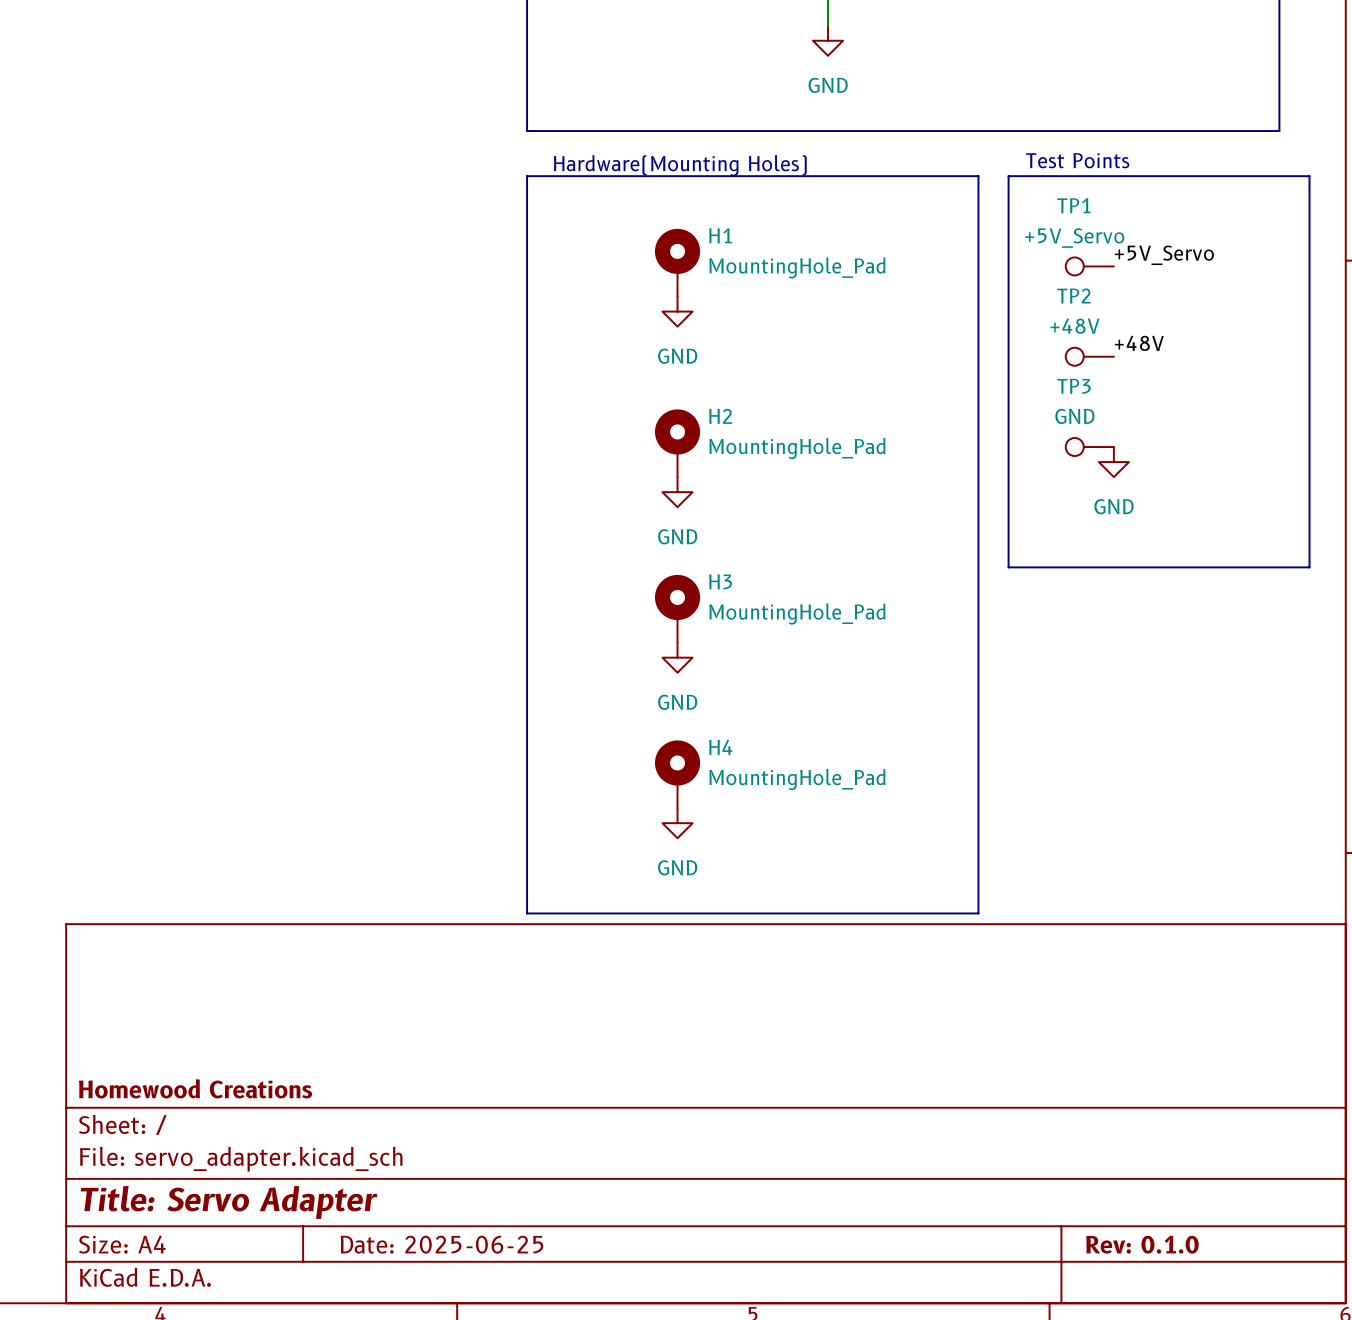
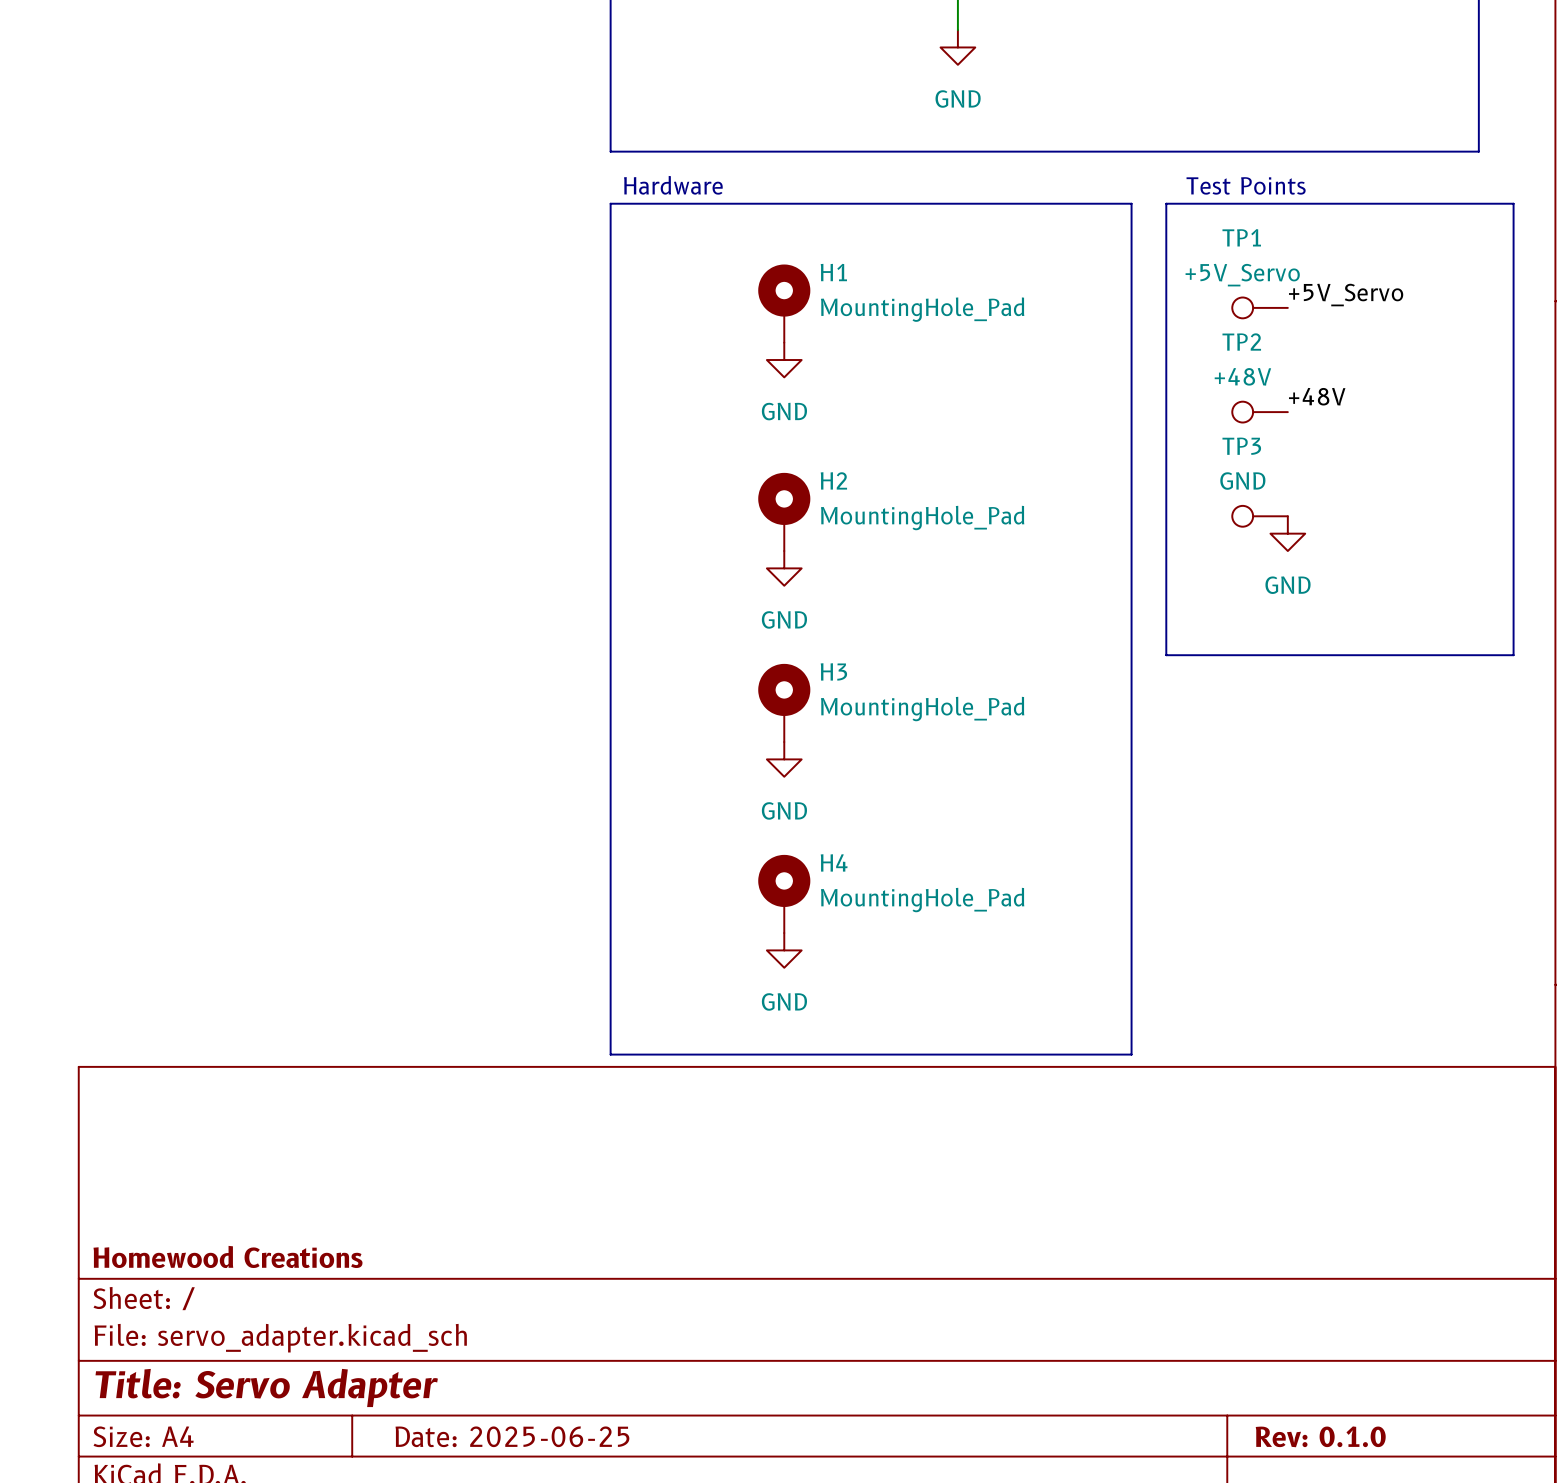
text: none -> Hardware (673, 185)
text: Hardware(Mounting Holes) (680, 165) -> none

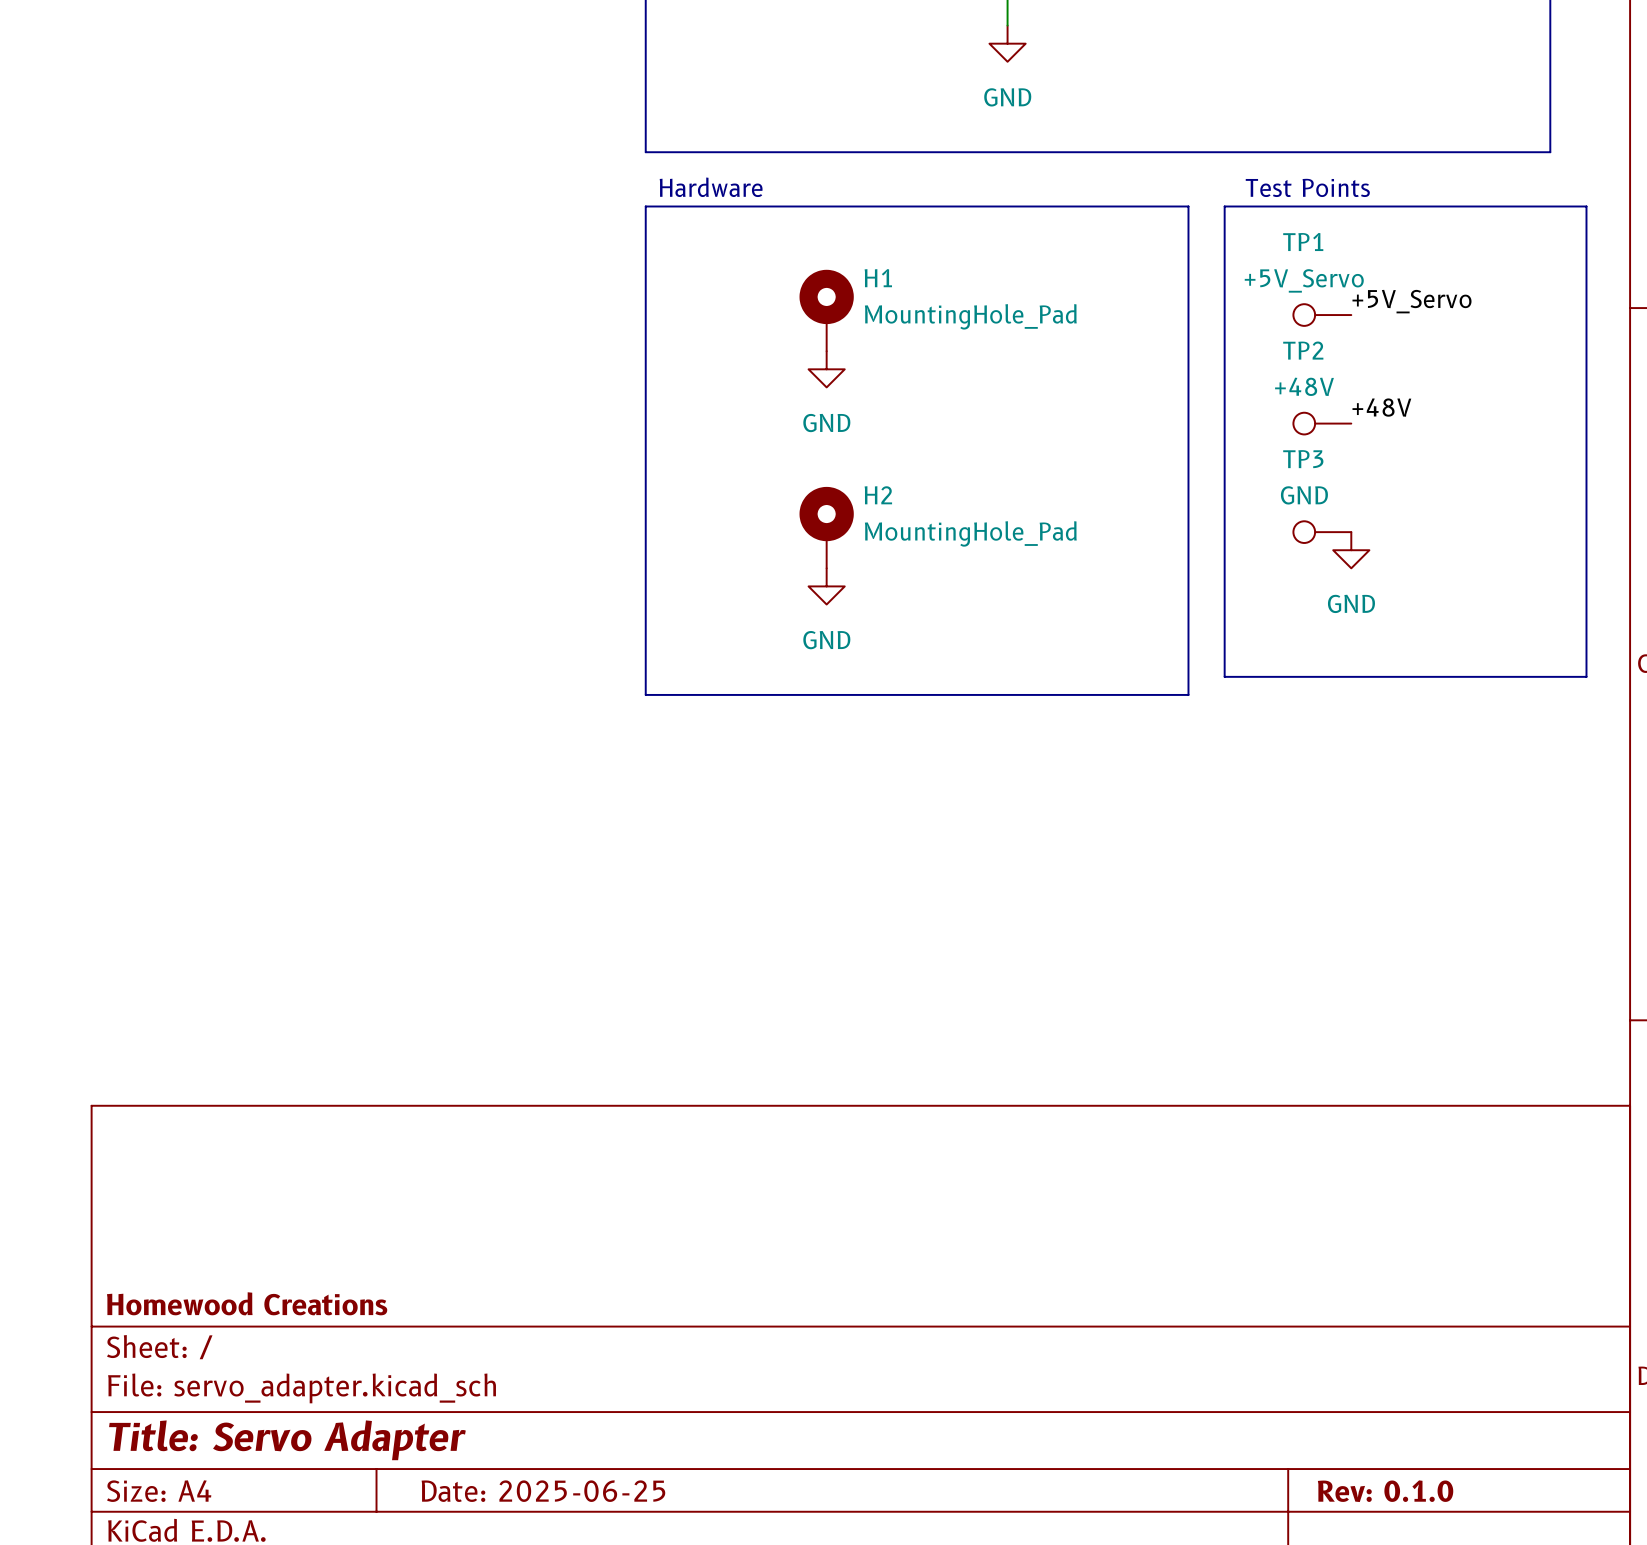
line: (610, 672) (610, 1054) (1131, 1054) (1131, 672) -> (645, 694) (1188, 694)
H3: MountingHole_Pad (784, 702) -> none
power symbol: GND (784, 759) -> none
H4: MountingHole_Pad (784, 893) -> none
power symbol: GND (784, 950) -> none

